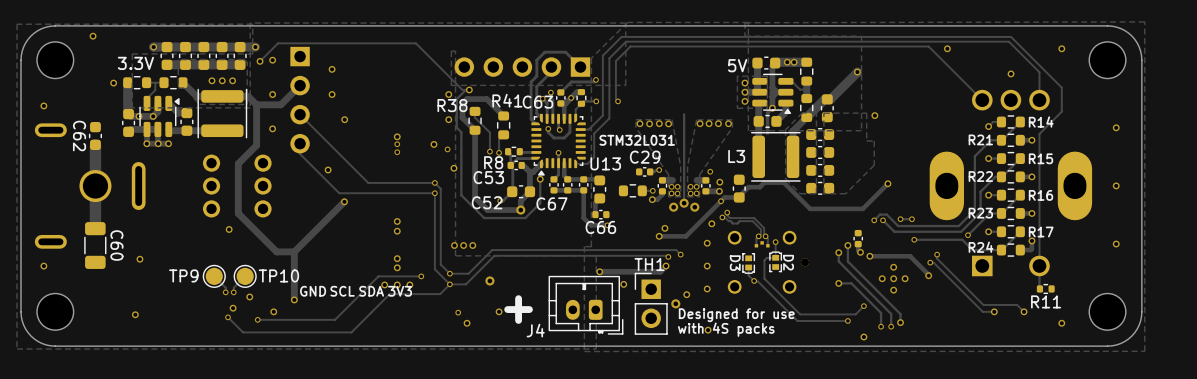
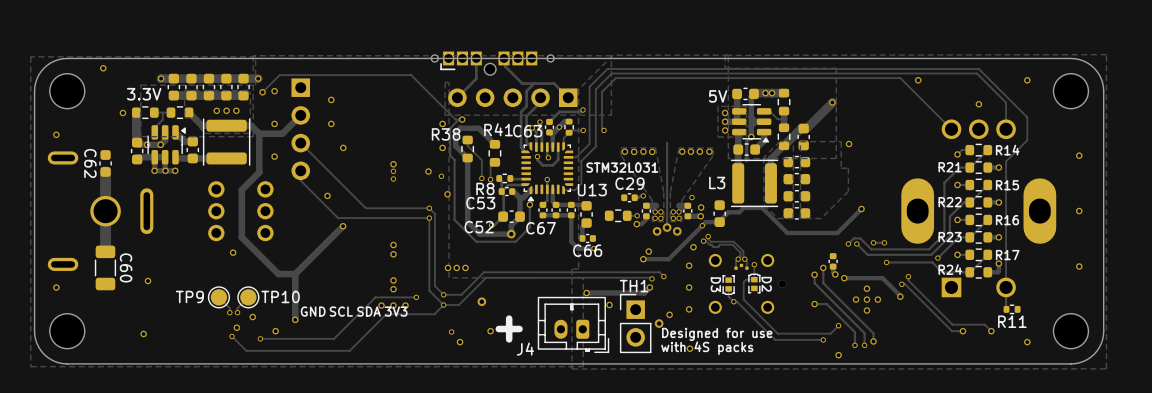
track: none -> (476, 62) (476, 78) (457, 97)
track: none -> (504, 62) (505, 66) (522, 83) (534, 83)
part: none -> (492, 63)

